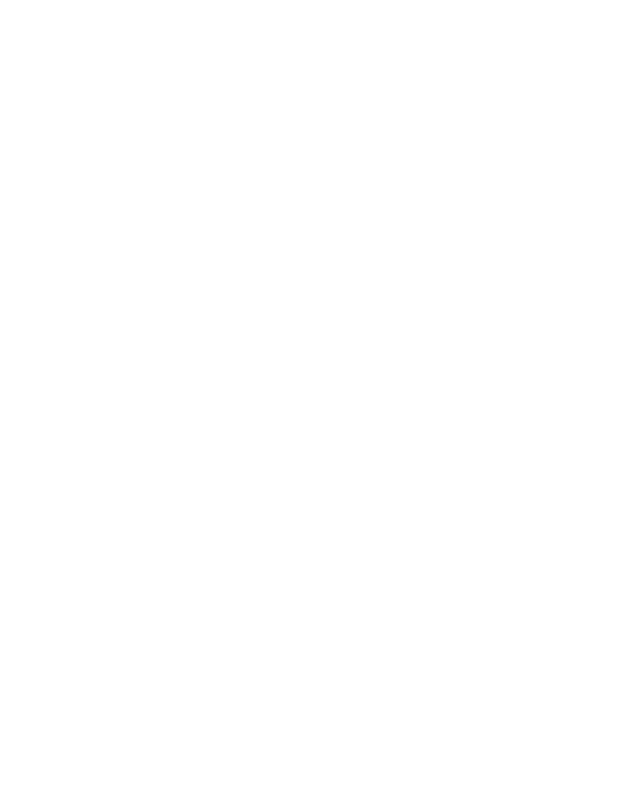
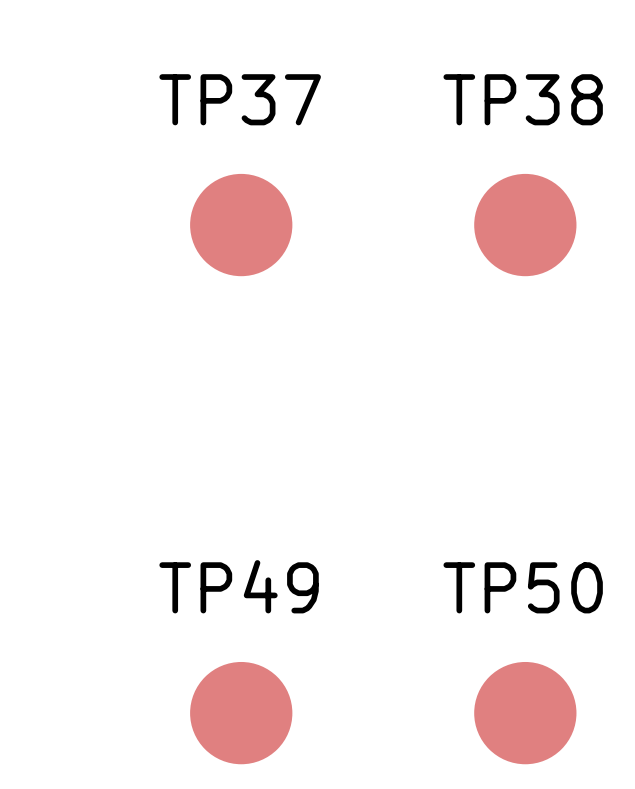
TP37: none -> (241, 225)
TP38: none -> (525, 225)
TP49: none -> (241, 713)
TP50: none -> (525, 713)

